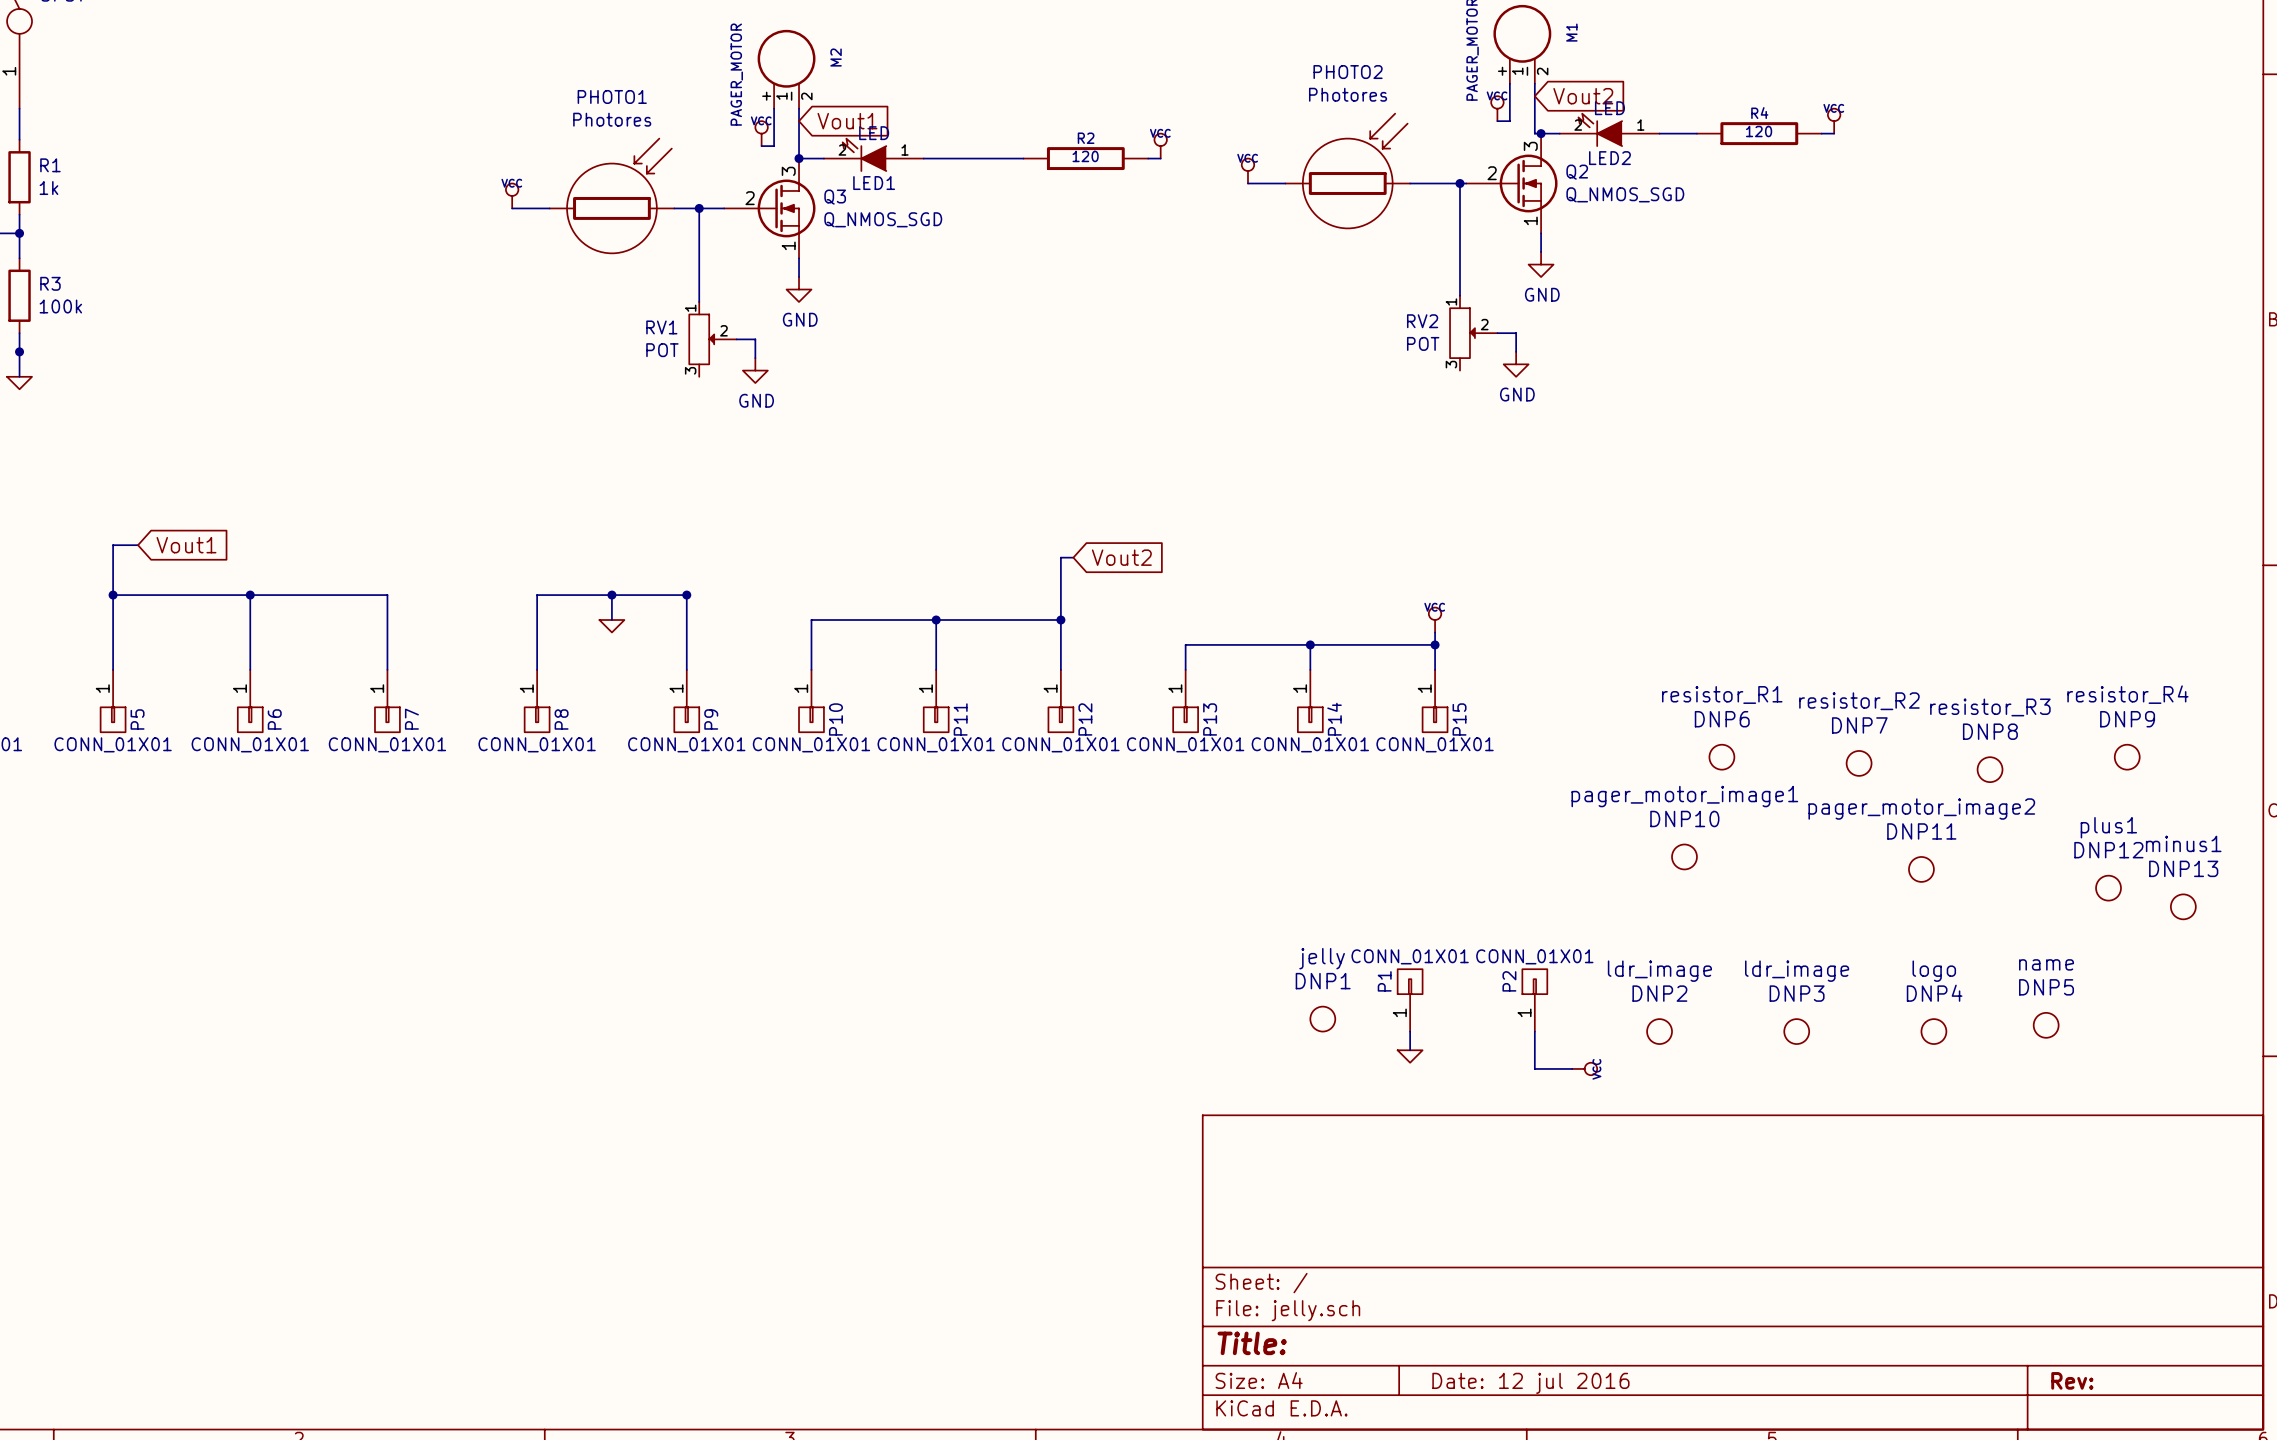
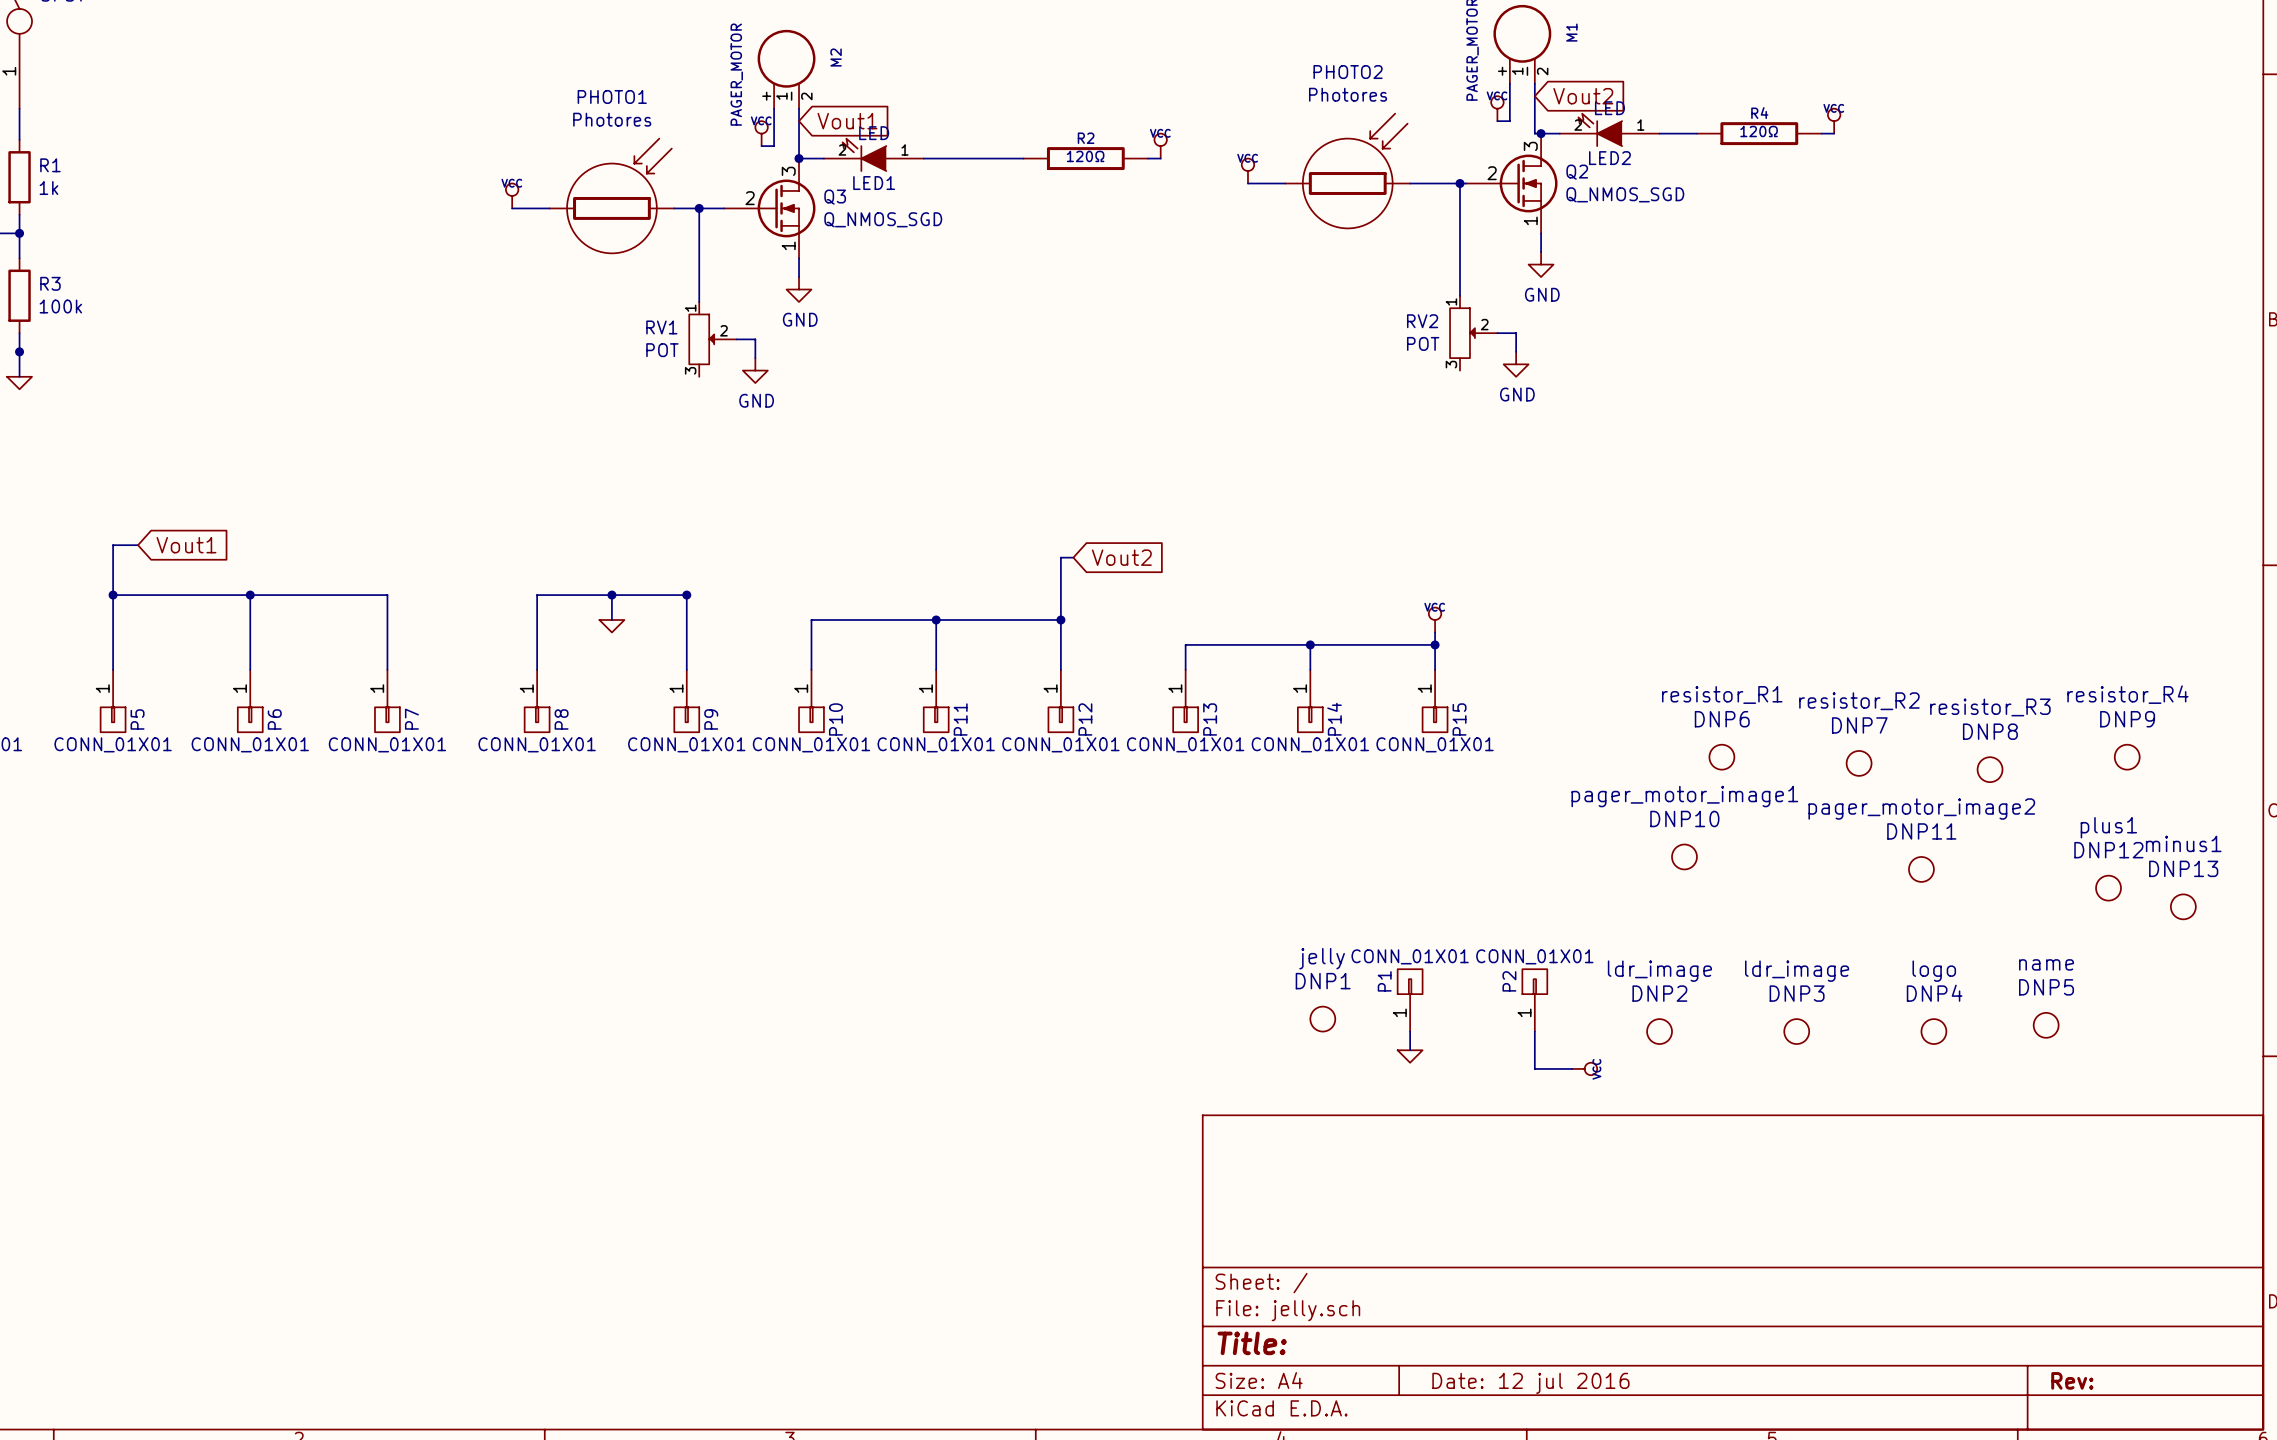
R4 value: 120 (1759, 131) -> 120Ω (1759, 131)
R2 value: 120 (1085, 156) -> 120Ω (1085, 156)

